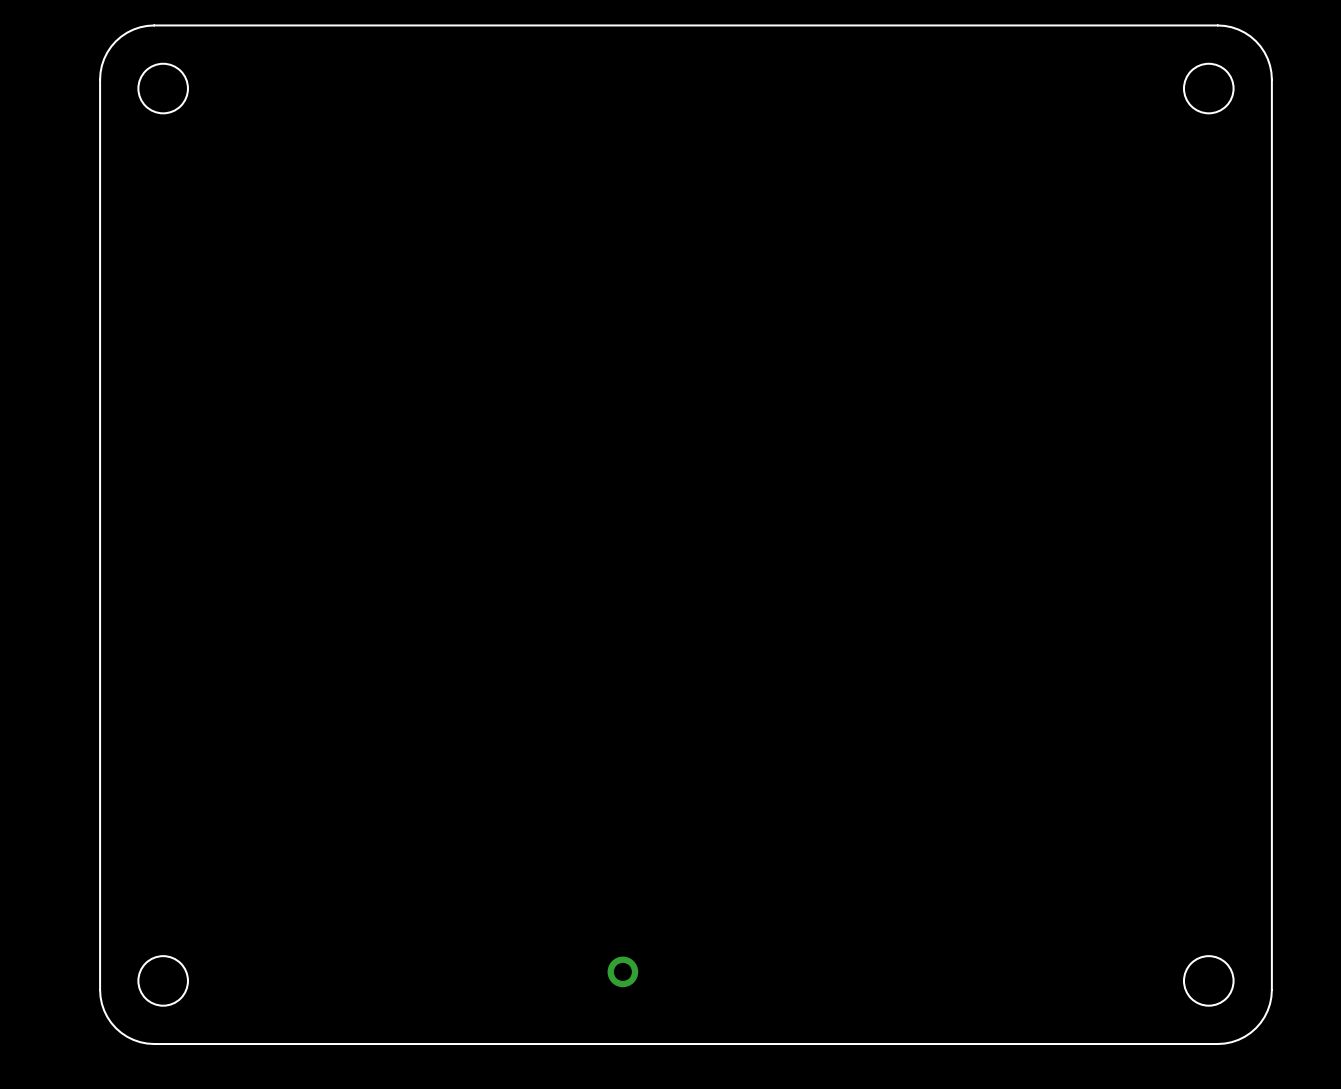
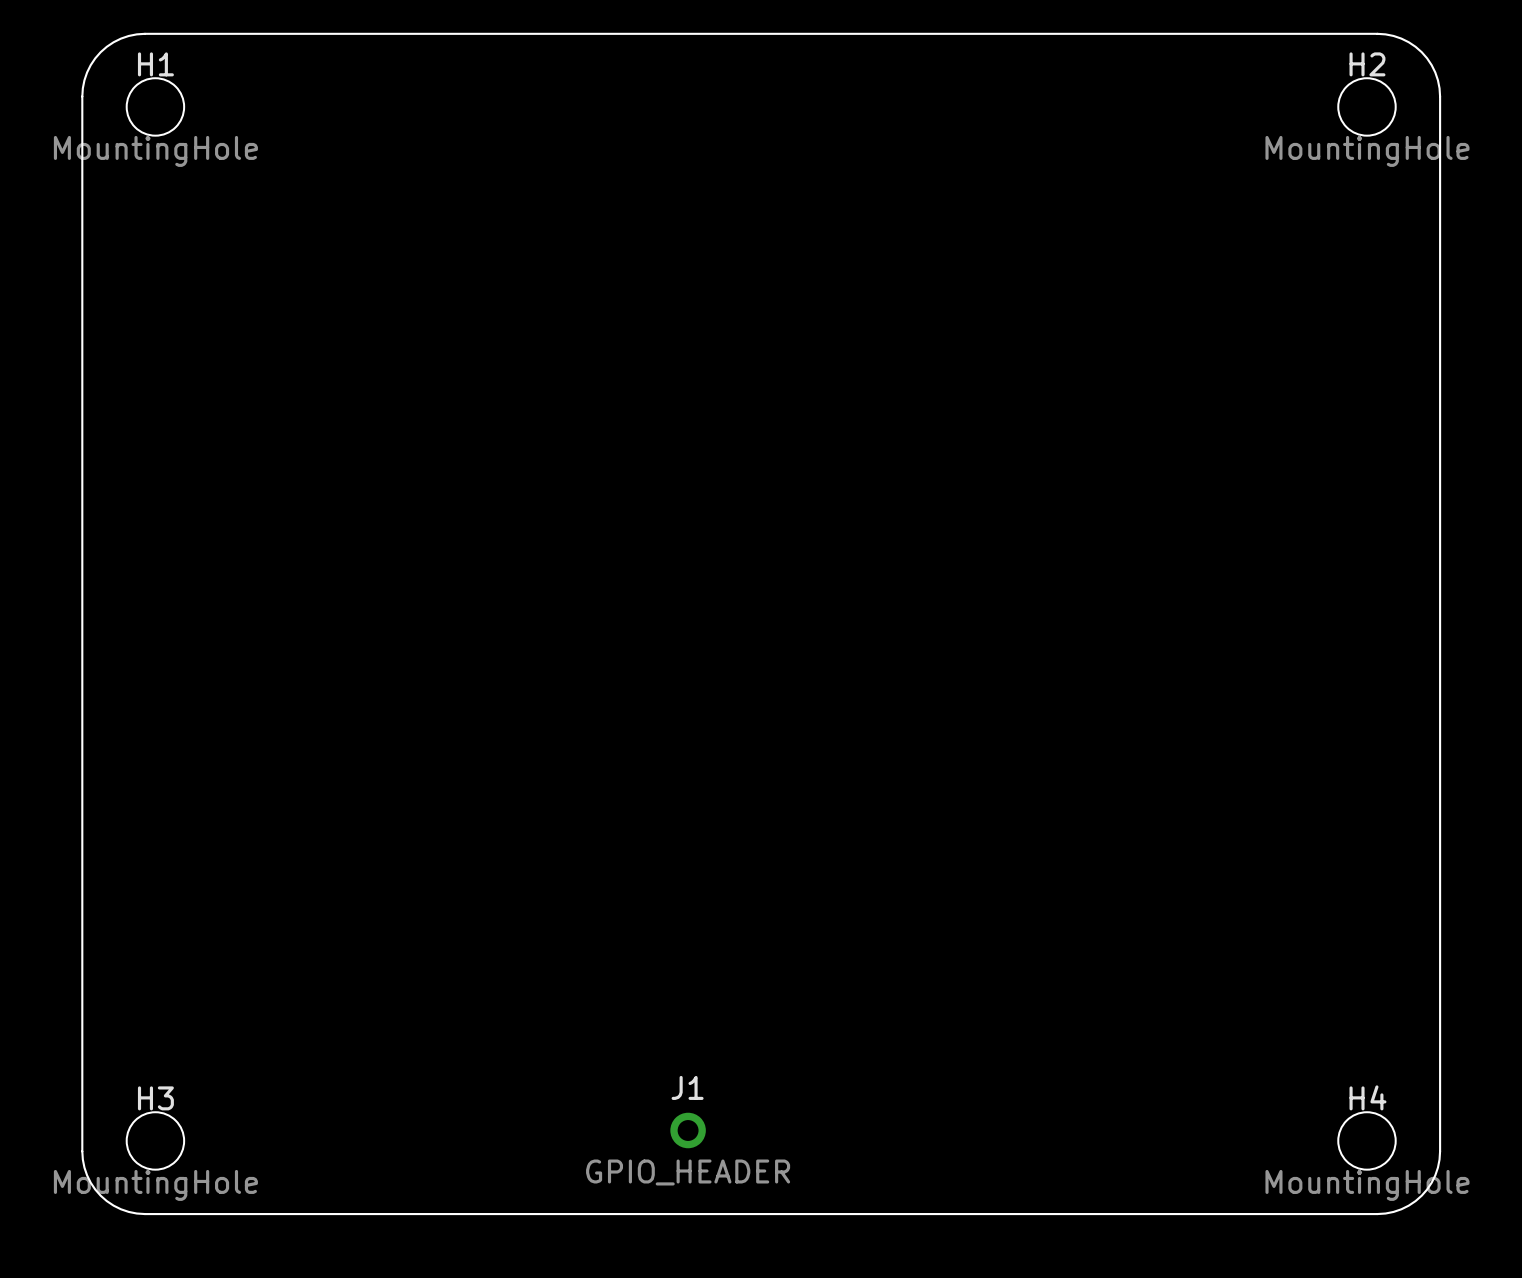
H1 name: none -> H1 (155, 64)
H2 name: none -> H2 (1367, 64)
H1 value: none -> MountingHole (155, 151)
H2 value: none -> MountingHole (1367, 151)
J1 name: none -> J1 (687, 1087)
H4 name: none -> H4 (1367, 1097)
H3 name: none -> H3 (155, 1098)
J1 value: none -> GPIO_HEADER (688, 1172)
H3 value: none -> MountingHole (155, 1185)
H4 value: none -> MountingHole (1367, 1185)

